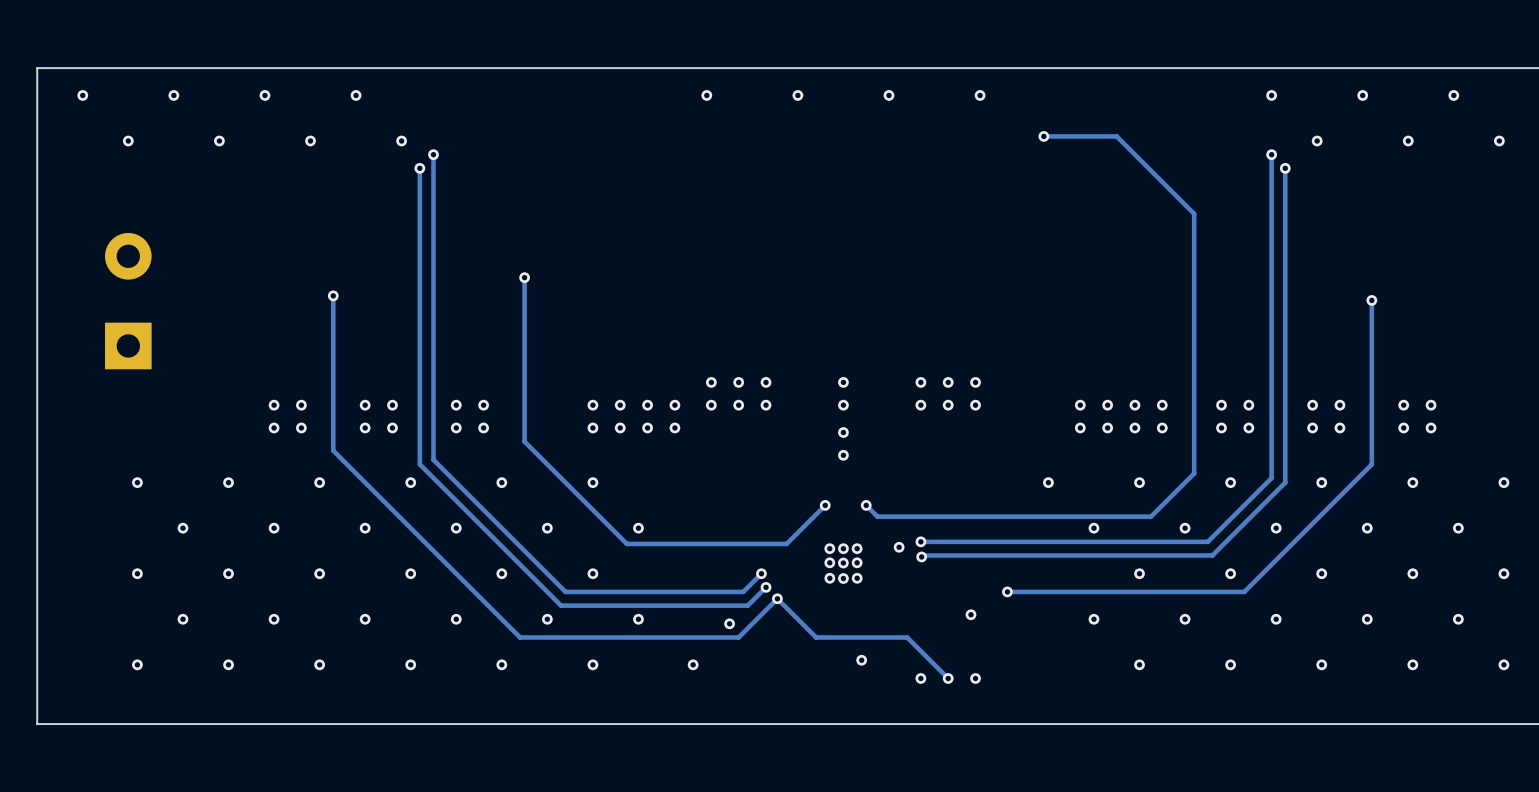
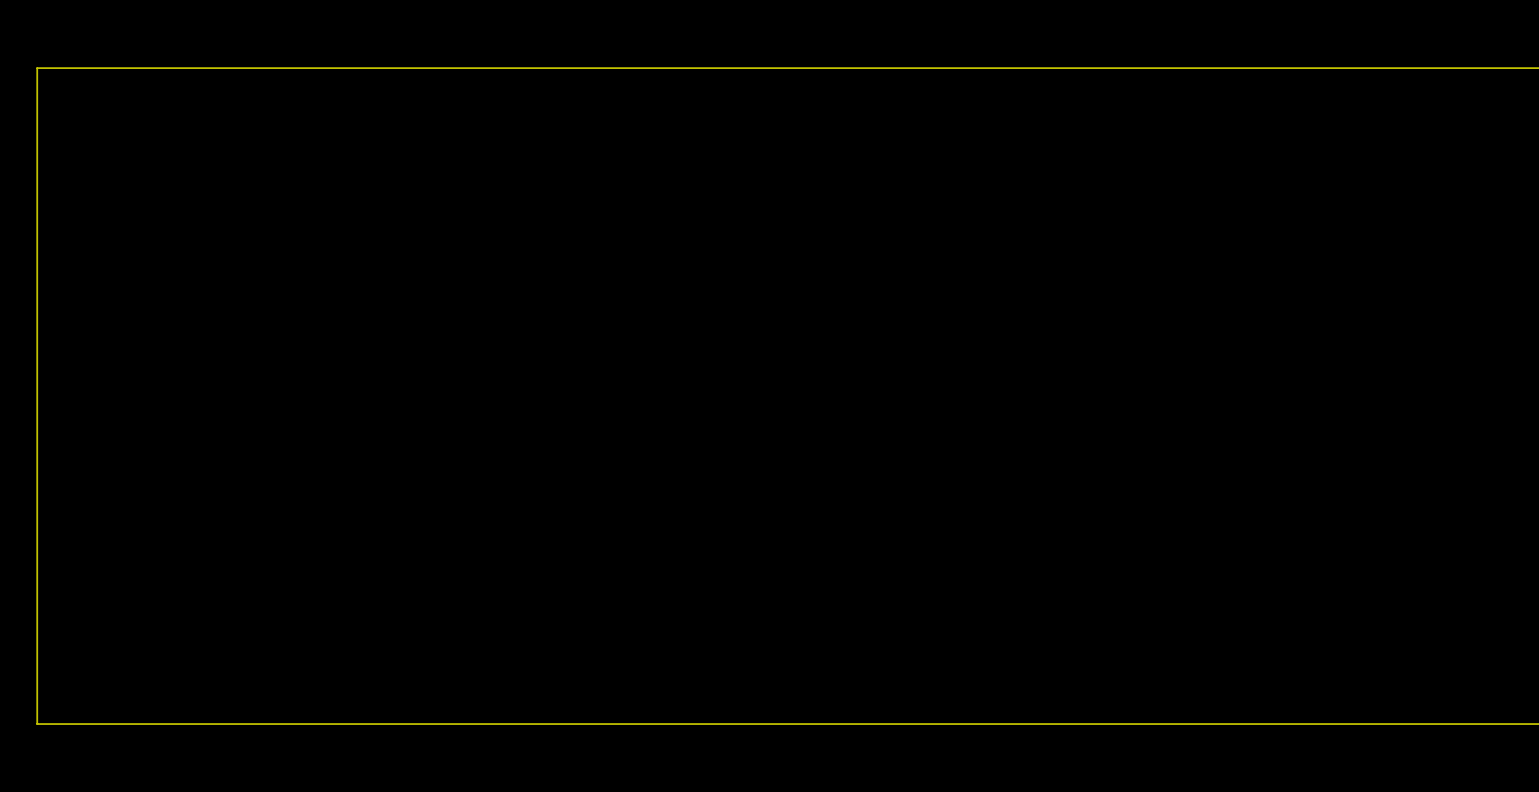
via: (82, 95) -> none
via: (173, 95) -> none
via: (264, 95) -> none
via: (356, 95) -> none
via: (706, 95) -> none
via: (797, 95) -> none
via: (889, 95) -> none
via: (980, 95) -> none
via: (1271, 95) -> none
via: (1362, 95) -> none
via: (1453, 95) -> none
track: (1043, 136) (1116, 136) (1194, 213) (1194, 473) (1151, 516) (877, 516) (866, 505) -> none
via: (1043, 136) -> none
via: (128, 141) -> none
via: (219, 141) -> none
via: (310, 141) -> none
via: (401, 141) -> none
via: (1317, 141) -> none
via: (1408, 141) -> none
via: (1499, 141) -> none
track: (433, 154) (433, 459) (565, 591) (743, 591) (761, 573) -> none
via: (433, 154) -> none
track: (1271, 154) (1271, 478) (1207, 541) (920, 541) -> none
via: (1271, 154) -> none
track: (419, 168) (419, 464) (561, 605) (747, 605) (766, 587) -> none
via: (419, 168) -> none
track: (1285, 168) (1285, 482) (1212, 555) (921, 556) -> none
via: (1285, 168) -> none
track: (524, 277) (524, 441) (626, 543) (786, 543) (825, 505) -> none
via: (524, 277) -> none
track: (333, 295) (333, 450) (520, 637) (738, 637) (777, 598) (816, 637) (907, 637) (948, 678) -> none
via: (333, 295) -> none
track: (1371, 300) (1371, 464) (1244, 591) (1007, 591) -> none
via: (1371, 300) -> none
part: (128, 301) -> none
via: (711, 382) -> none
via: (738, 382) -> none
via: (766, 382) -> none
via: (843, 382) -> none
via: (920, 382) -> none
via: (948, 382) -> none
via: (975, 382) -> none
via: (274, 405) -> none
via: (301, 405) -> none
via: (365, 405) -> none
via: (392, 405) -> none
via: (456, 405) -> none
via: (483, 405) -> none
via: (592, 405) -> none
via: (620, 405) -> none
via: (647, 405) -> none
via: (674, 405) -> none
via: (711, 405) -> none
via: (738, 405) -> none
via: (766, 405) -> none
via: (843, 405) -> none
via: (920, 405) -> none
via: (948, 405) -> none
via: (975, 405) -> none
via: (1080, 405) -> none
via: (1107, 405) -> none
via: (1134, 405) -> none
via: (1162, 405) -> none
via: (1221, 405) -> none
via: (1248, 405) -> none
via: (1312, 405) -> none
via: (1339, 405) -> none
via: (1403, 405) -> none
via: (1431, 405) -> none
via: (274, 427) -> none
via: (301, 427) -> none
via: (365, 427) -> none
via: (392, 427) -> none
via: (456, 427) -> none
via: (483, 427) -> none
via: (592, 427) -> none
via: (620, 427) -> none
via: (647, 427) -> none
via: (674, 427) -> none
via: (1080, 427) -> none
via: (1107, 427) -> none
via: (1134, 427) -> none
via: (1162, 427) -> none
via: (1221, 427) -> none
via: (1248, 427) -> none
via: (1312, 427) -> none
via: (1339, 427) -> none
via: (1403, 427) -> none
via: (1431, 427) -> none
via: (843, 432) -> none
via: (843, 455) -> none
via: (137, 482) -> none
via: (228, 482) -> none
via: (319, 482) -> none
via: (410, 482) -> none
via: (501, 482) -> none
via: (592, 482) -> none
via: (1048, 482) -> none
via: (1139, 482) -> none
via: (1230, 482) -> none
via: (1321, 482) -> none
via: (1412, 482) -> none
via: (1503, 482) -> none
via: (825, 505) -> none
via: (866, 505) -> none
via: (182, 528) -> none
via: (274, 528) -> none
via: (365, 528) -> none
via: (456, 528) -> none
via: (547, 528) -> none
via: (638, 528) -> none
via: (1093, 528) -> none
via: (1185, 528) -> none
via: (1276, 528) -> none
via: (1367, 528) -> none
via: (1458, 528) -> none
via: (920, 541) -> none
via: (899, 547) -> none
via: (829, 548) -> none
via: (843, 548) -> none
via: (857, 548) -> none
via: (921, 556) -> none
via: (829, 562) -> none
via: (857, 562) -> none
via: (843, 563) -> none
via: (137, 573) -> none
via: (228, 573) -> none
via: (319, 573) -> none
via: (410, 573) -> none
via: (501, 573) -> none
via: (592, 573) -> none
via: (761, 573) -> none
via: (1139, 573) -> none
via: (1230, 573) -> none
via: (1321, 573) -> none
via: (1412, 573) -> none
via: (1503, 573) -> none
via: (829, 578) -> none
via: (843, 578) -> none
via: (857, 578) -> none
via: (766, 587) -> none
via: (1007, 591) -> none
via: (777, 598) -> none
via: (970, 614) -> none
via: (182, 619) -> none
via: (274, 619) -> none
via: (365, 619) -> none
via: (456, 619) -> none
via: (547, 619) -> none
via: (638, 619) -> none
via: (1093, 619) -> none
via: (1185, 619) -> none
via: (1276, 619) -> none
via: (1367, 619) -> none
via: (1458, 619) -> none
via: (729, 623) -> none
via: (861, 660) -> none
via: (137, 664) -> none
via: (228, 664) -> none
via: (319, 664) -> none
via: (410, 664) -> none
via: (501, 664) -> none
via: (592, 664) -> none
via: (693, 664) -> none
via: (1139, 664) -> none
via: (1230, 664) -> none
via: (1321, 664) -> none
via: (1412, 664) -> none
via: (1503, 664) -> none
via: (920, 678) -> none
via: (948, 678) -> none
via: (975, 678) -> none

